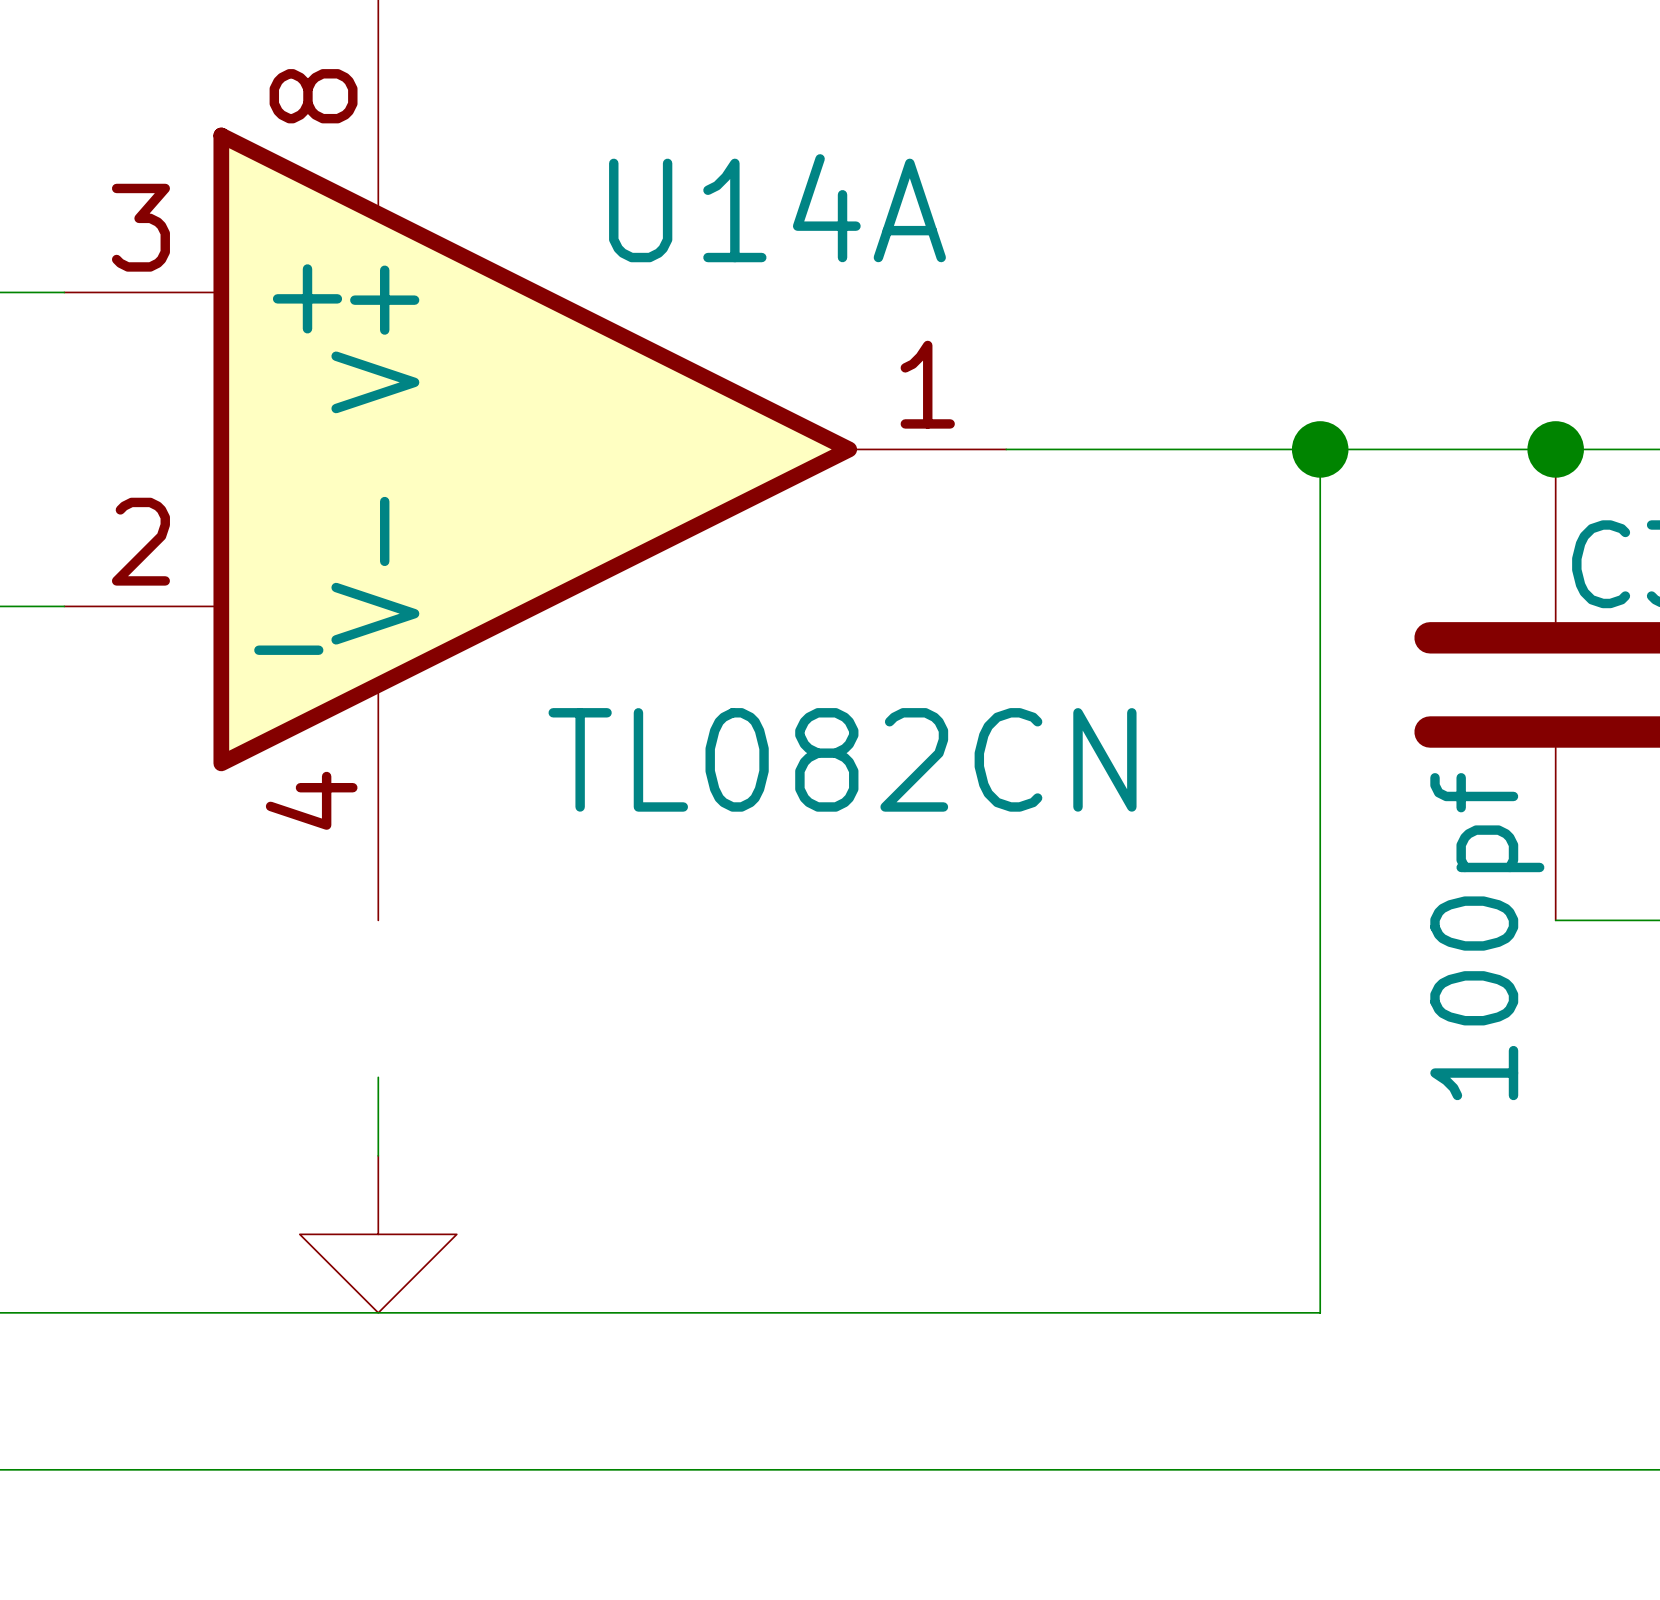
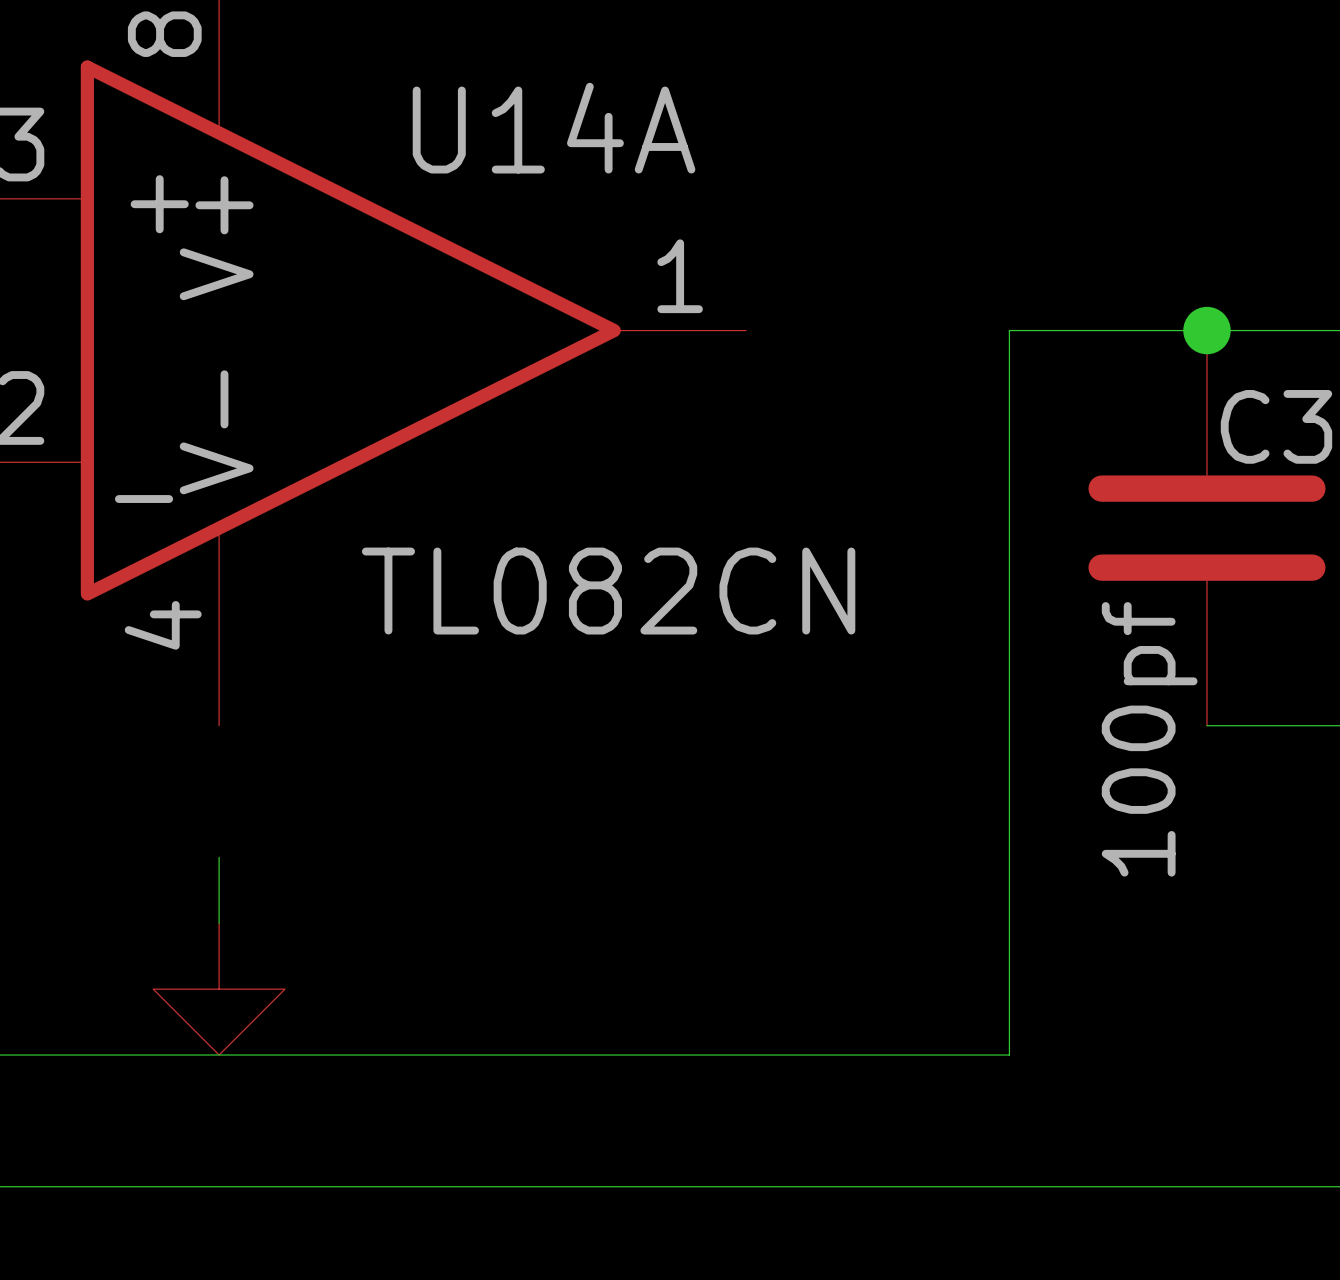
wire: (1006, 449) (1320, 449) -> none
junction: (1320, 449) -> none

